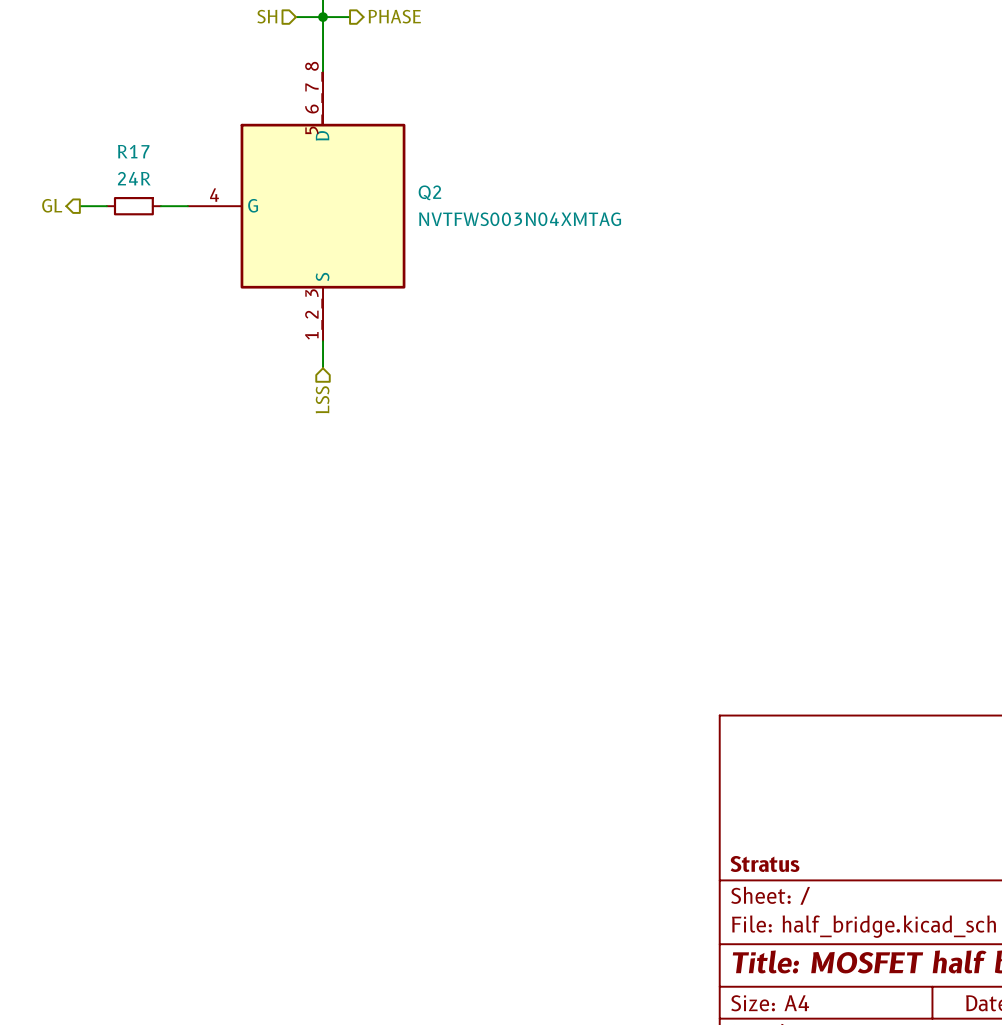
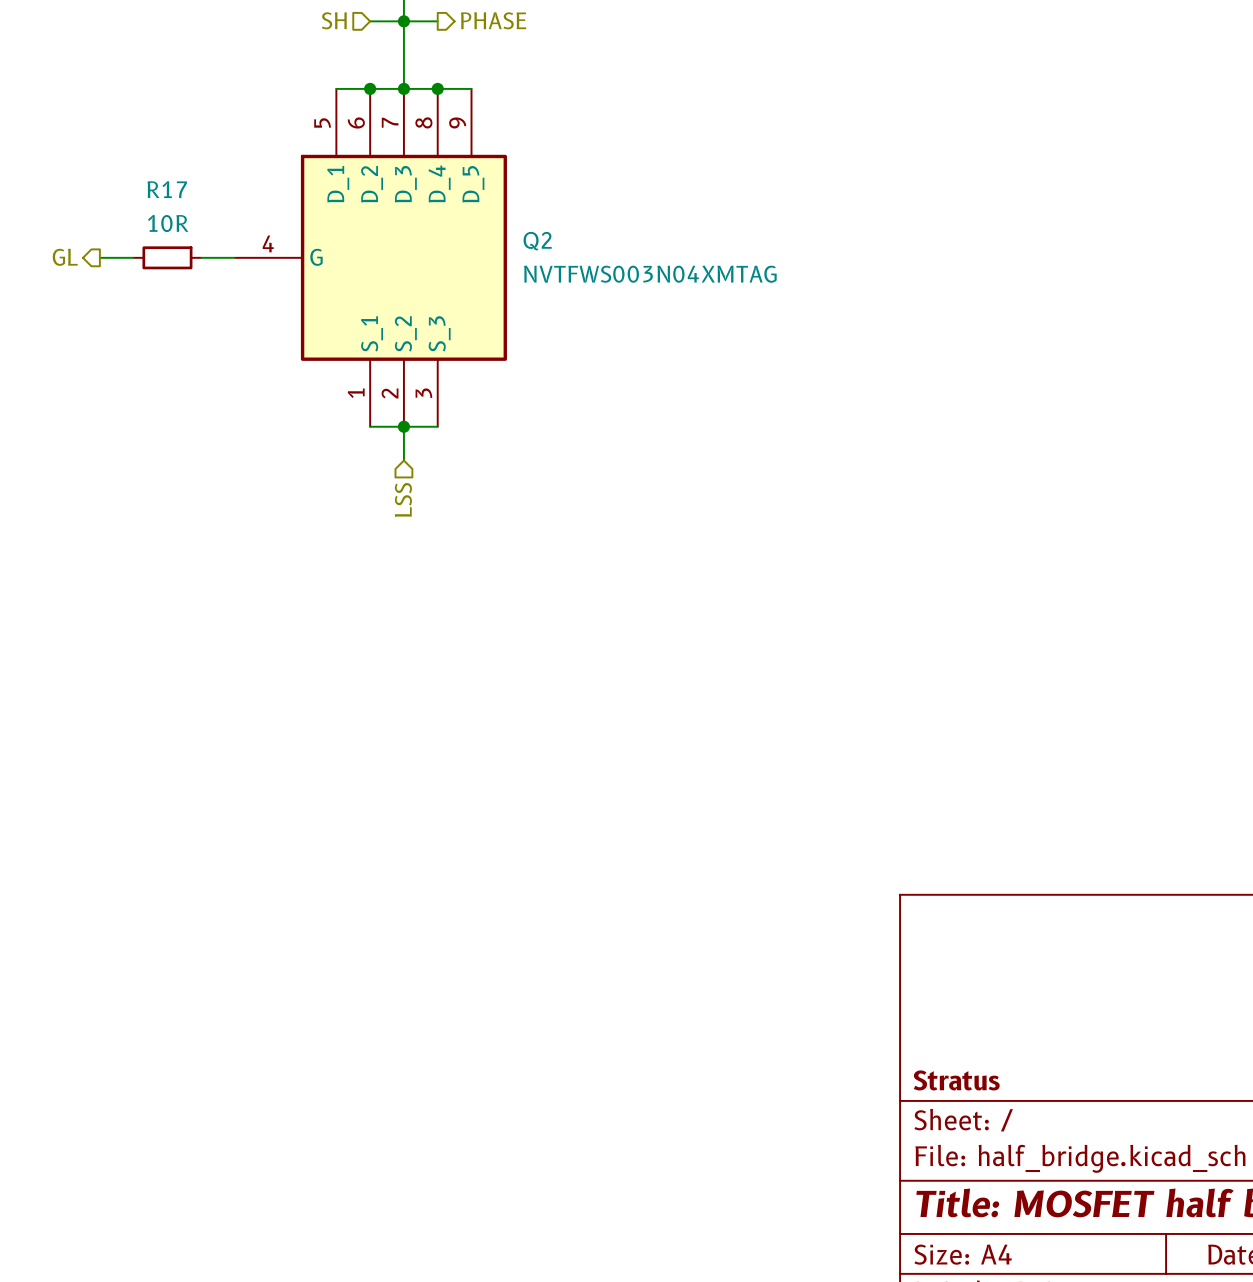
Q2 symbol: [187, 71, 406, 342] -> [235, 88, 507, 427]
wire: none -> (336, 88) (471, 88)
junction: none -> (370, 88)
junction: none -> (403, 88)
junction: none -> (437, 88)
R17 value: 24R (134, 178) -> 10R (168, 223)
wire: none -> (370, 426) (437, 426)
junction: none -> (403, 426)

